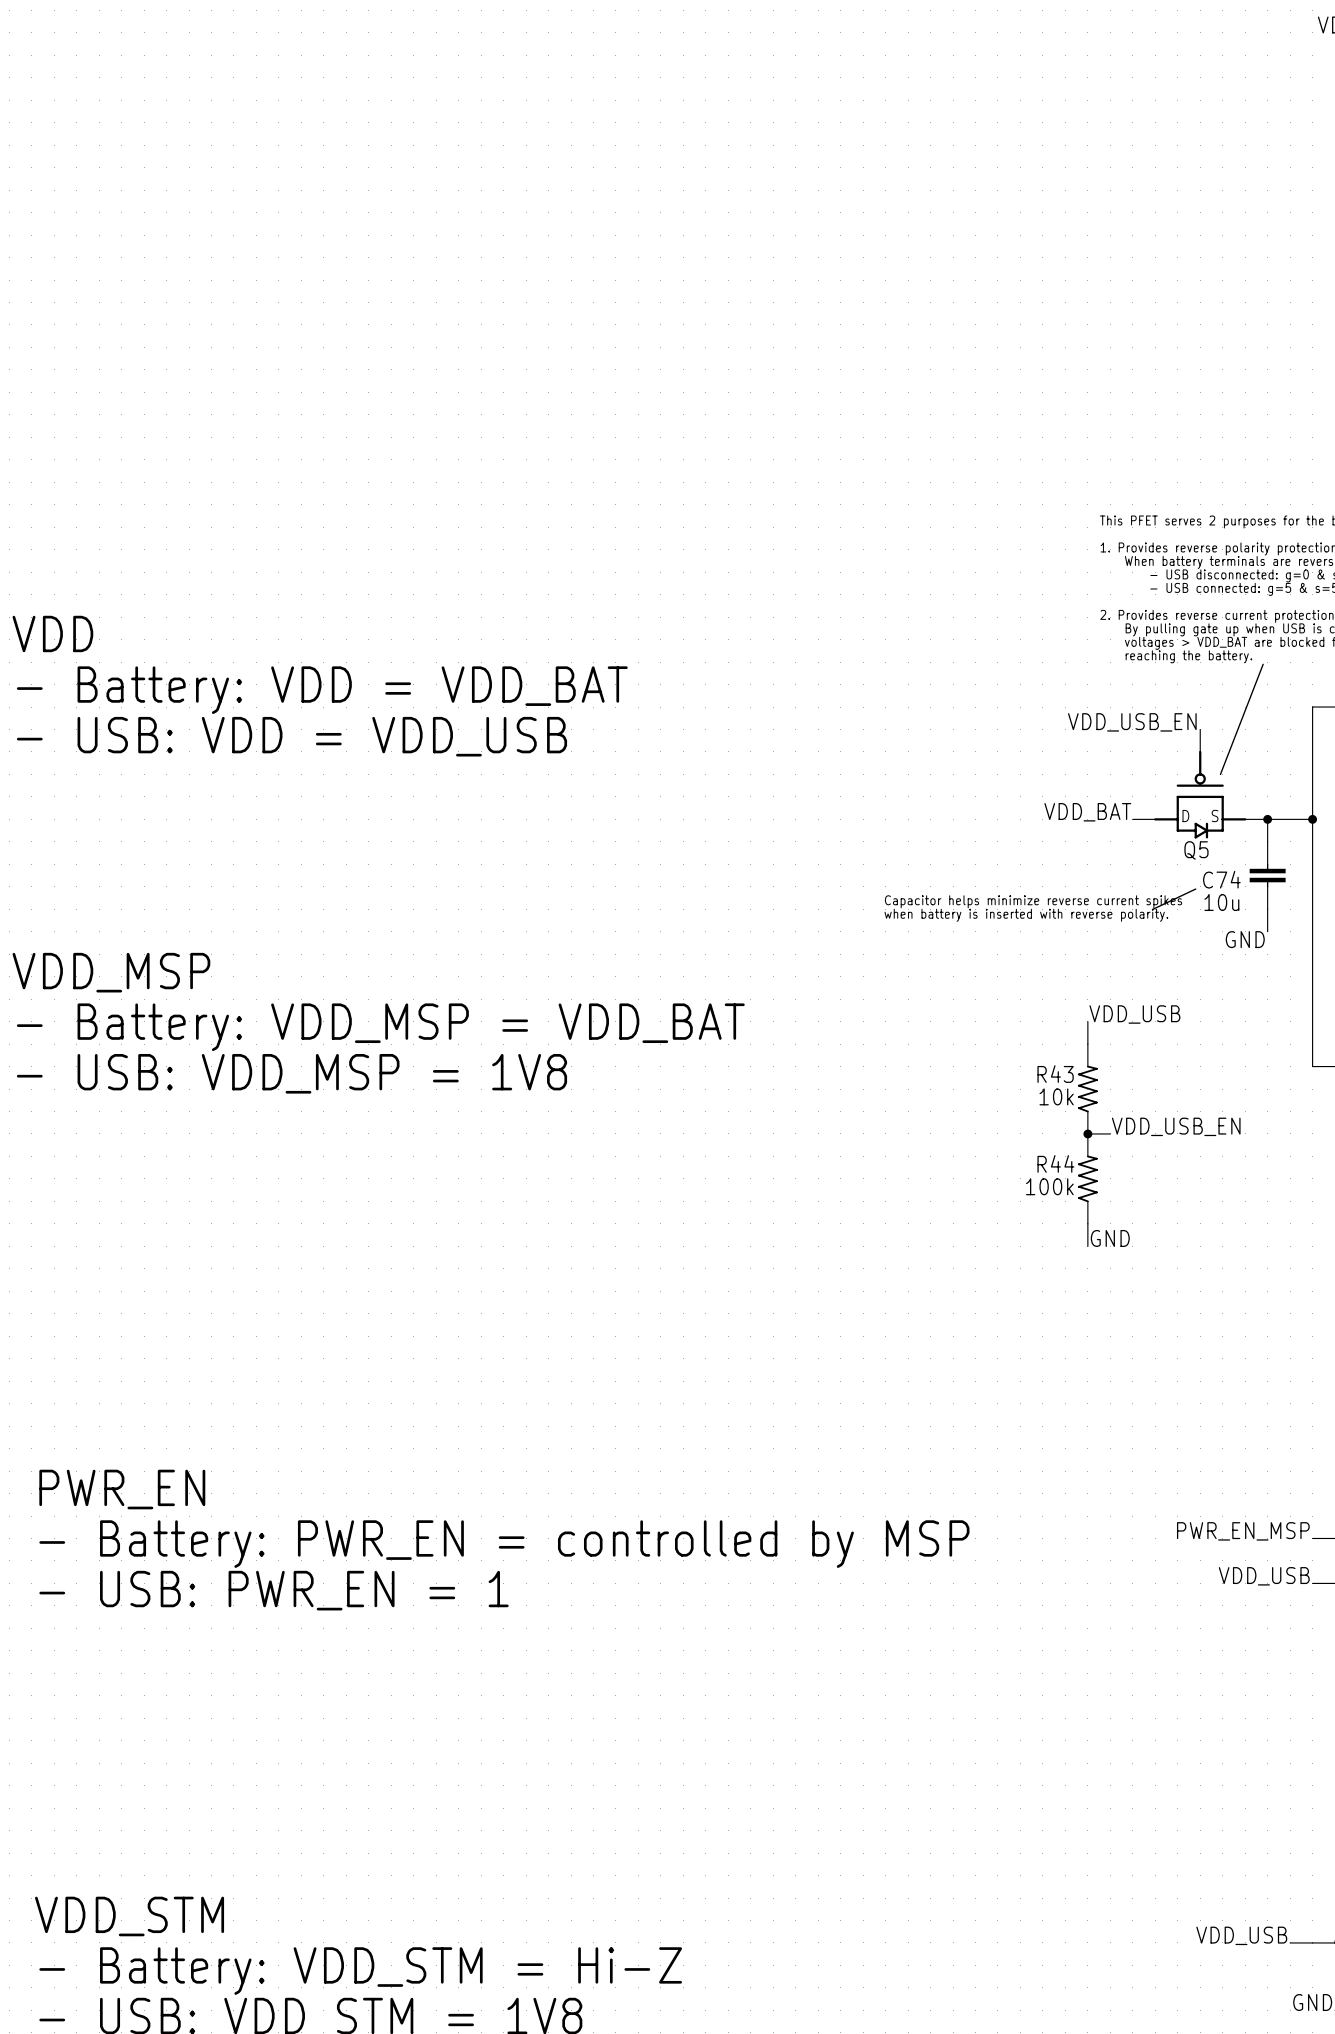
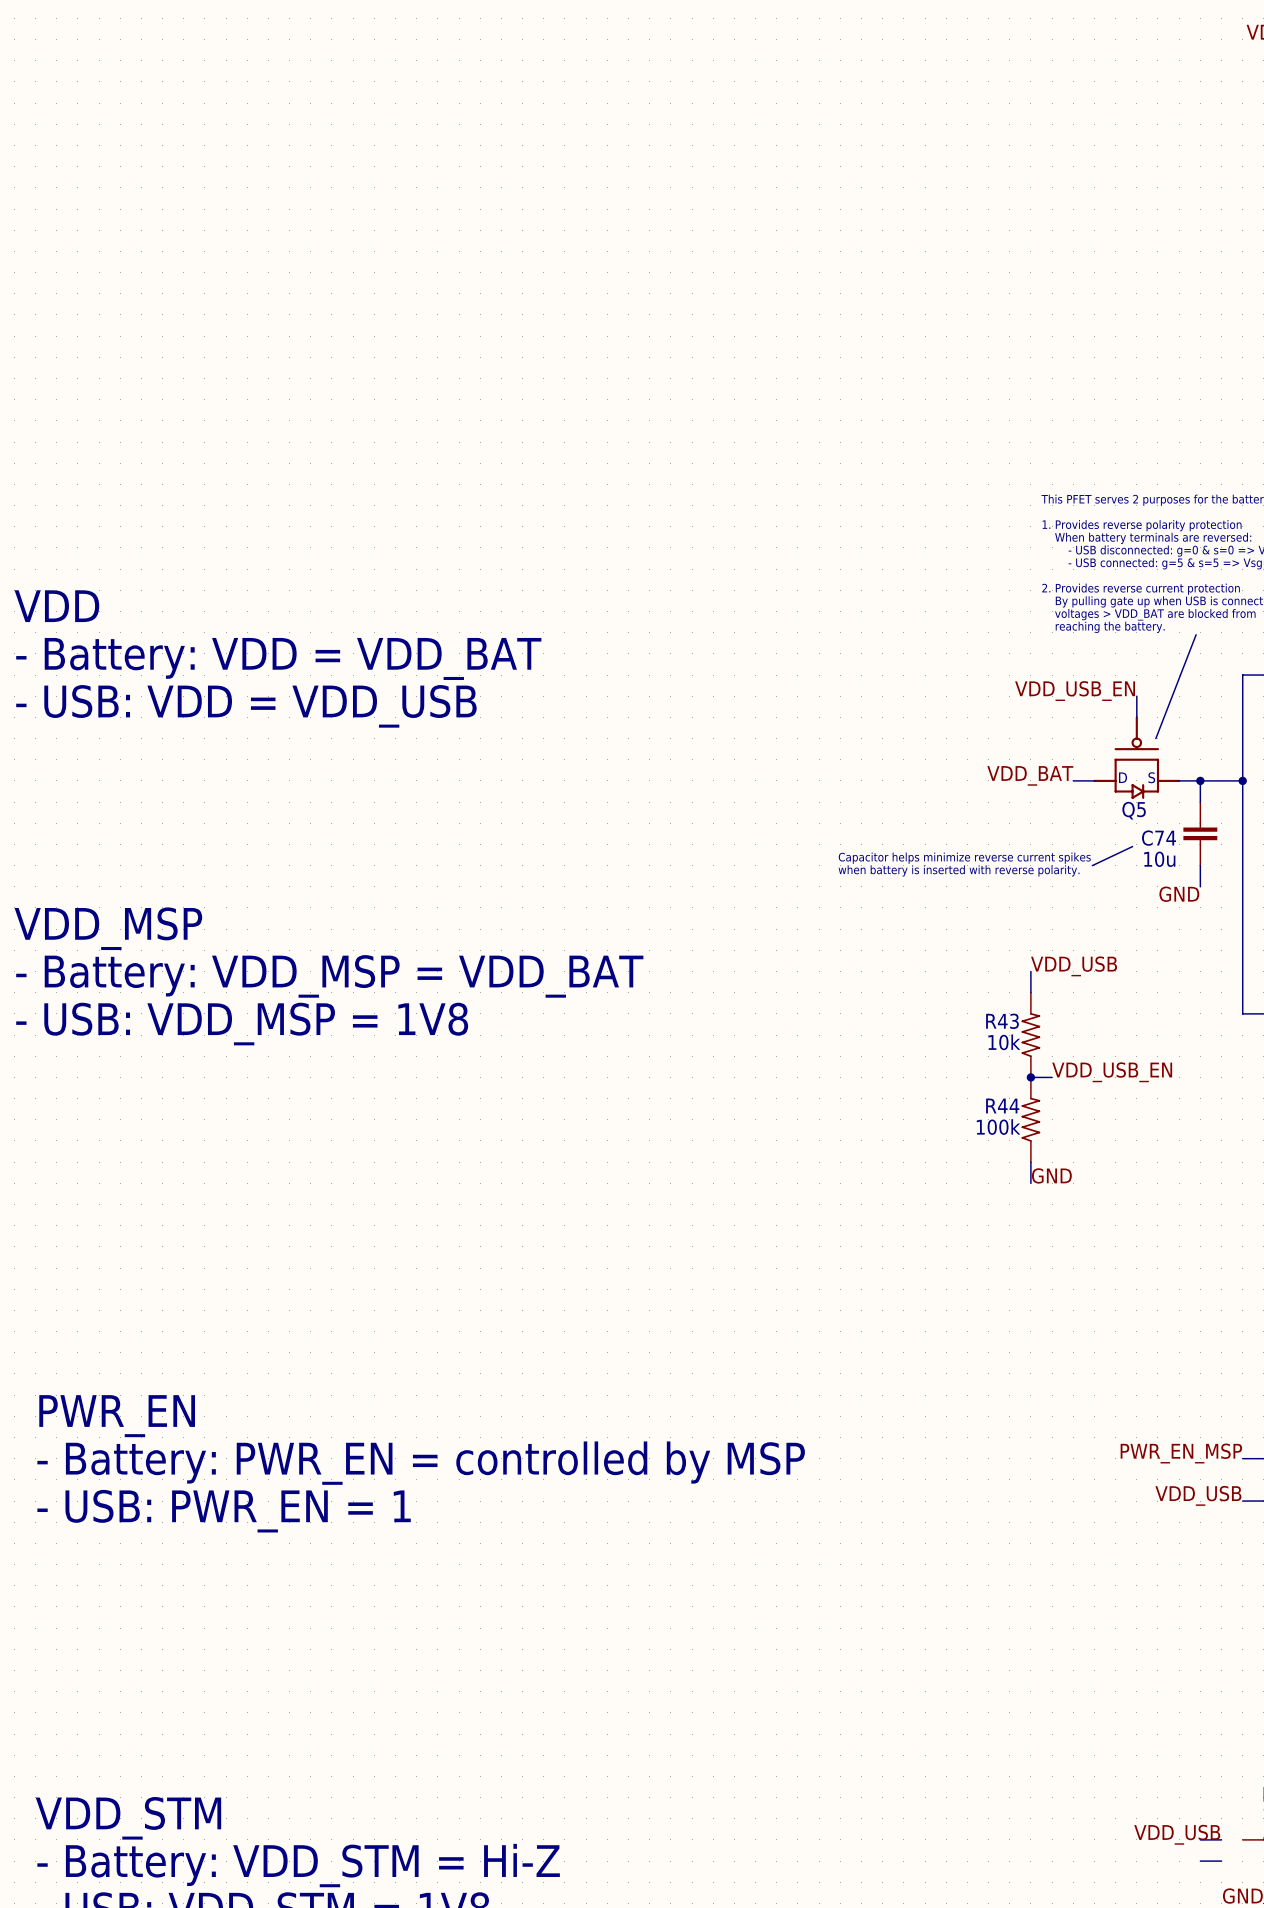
wire: (1290, 1942) (1312, 1942) -> (1221, 1839) (1200, 1839)
wire: none -> (1200, 1861) (1221, 1861)

